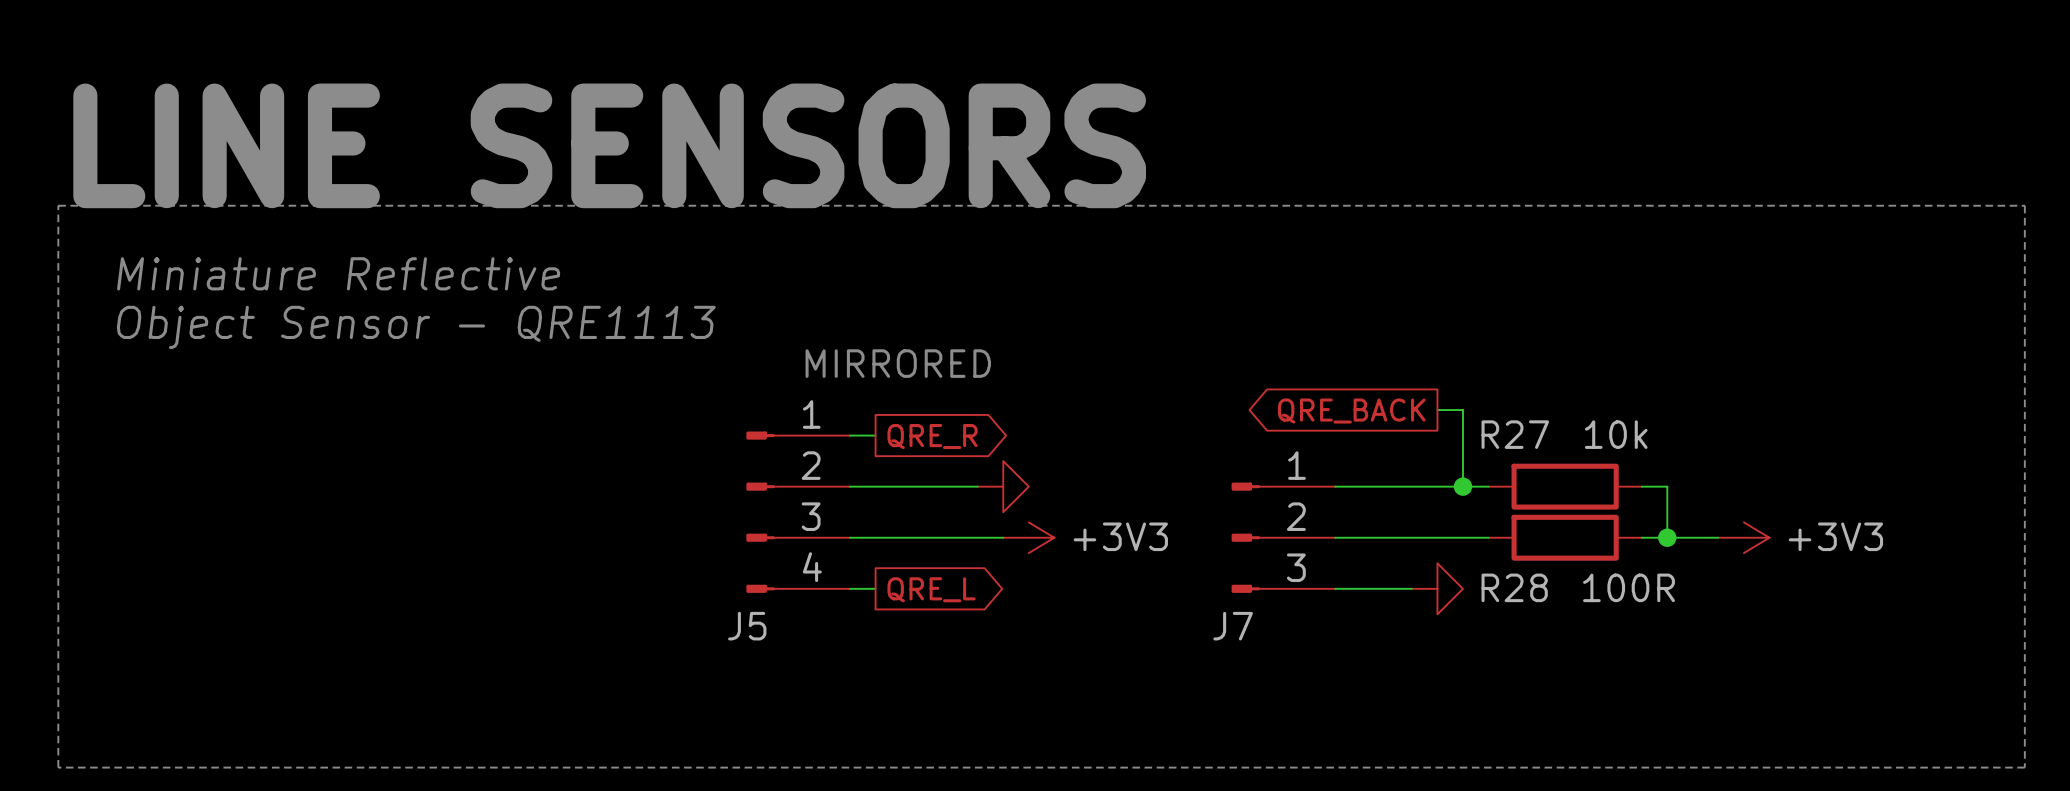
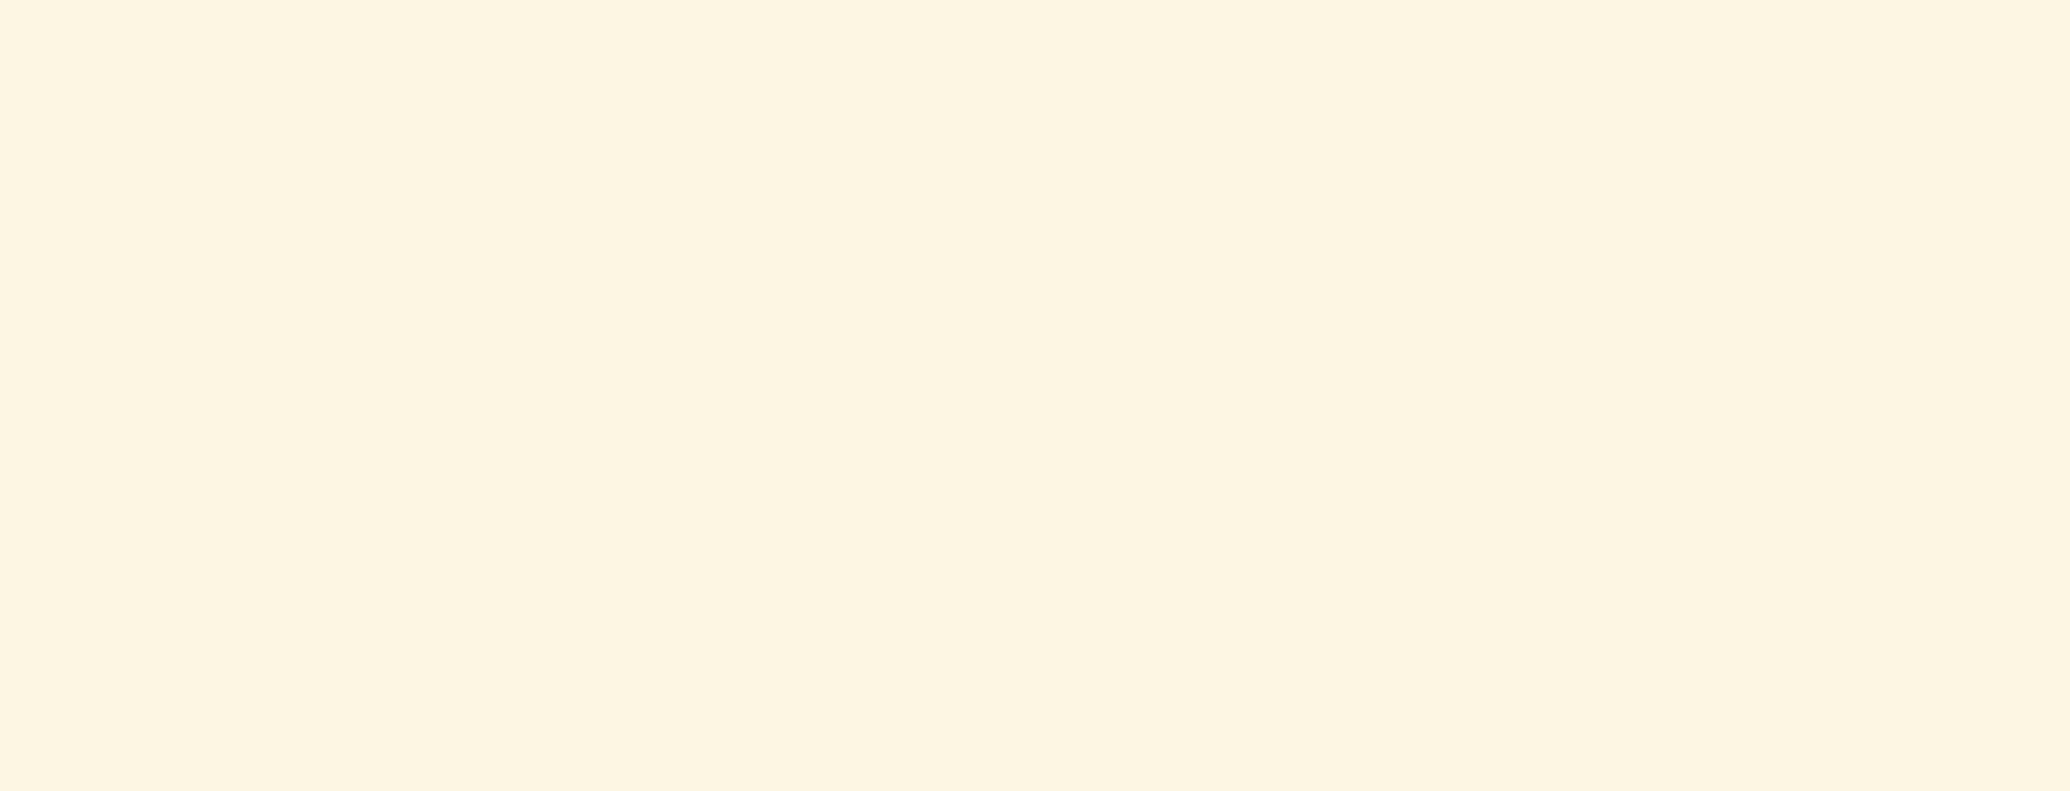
text: LINE SENSORS (609, 145) -> none
line: (58, 205) (2024, 205) (2024, 767) (58, 767) (58, 205) -> none
text: Miniature Reflective (338, 273) -> none
text: Object Sensor - QRE1113 (416, 327) -> none
text: MIRRORED (898, 363) -> none
wire: (1437, 410) (1462, 410) (1462, 486) -> none
global label: QRE_BACK (1351, 411) -> none
wire: (850, 435) (875, 435) -> none
global label: QRE_R (932, 436) -> none
wire: (850, 486) (977, 486) -> none
power symbol: (1003, 486) -> none
wire: (1335, 486) (1488, 486) -> none
junction: (1462, 486) -> none
R27: 10k (1565, 486) -> none
wire: (1641, 486) (1667, 486) (1667, 537) -> none
J5: (798, 512) -> none
wire: (850, 537) (1003, 537) -> none
power symbol: +3V3 (1028, 537) -> none
J7: (1283, 537) -> none
wire: (1335, 537) (1488, 537) -> none
R28: 100R (1565, 537) -> none
wire: (1641, 537) (1718, 537) -> none
junction: (1667, 537) -> none
power symbol: +3V3 (1743, 537) -> none
wire: (850, 588) (875, 588) -> none
wire: (1335, 588) (1411, 588) -> none
power symbol: (1437, 588) -> none
global label: QRE_L (931, 589) -> none

